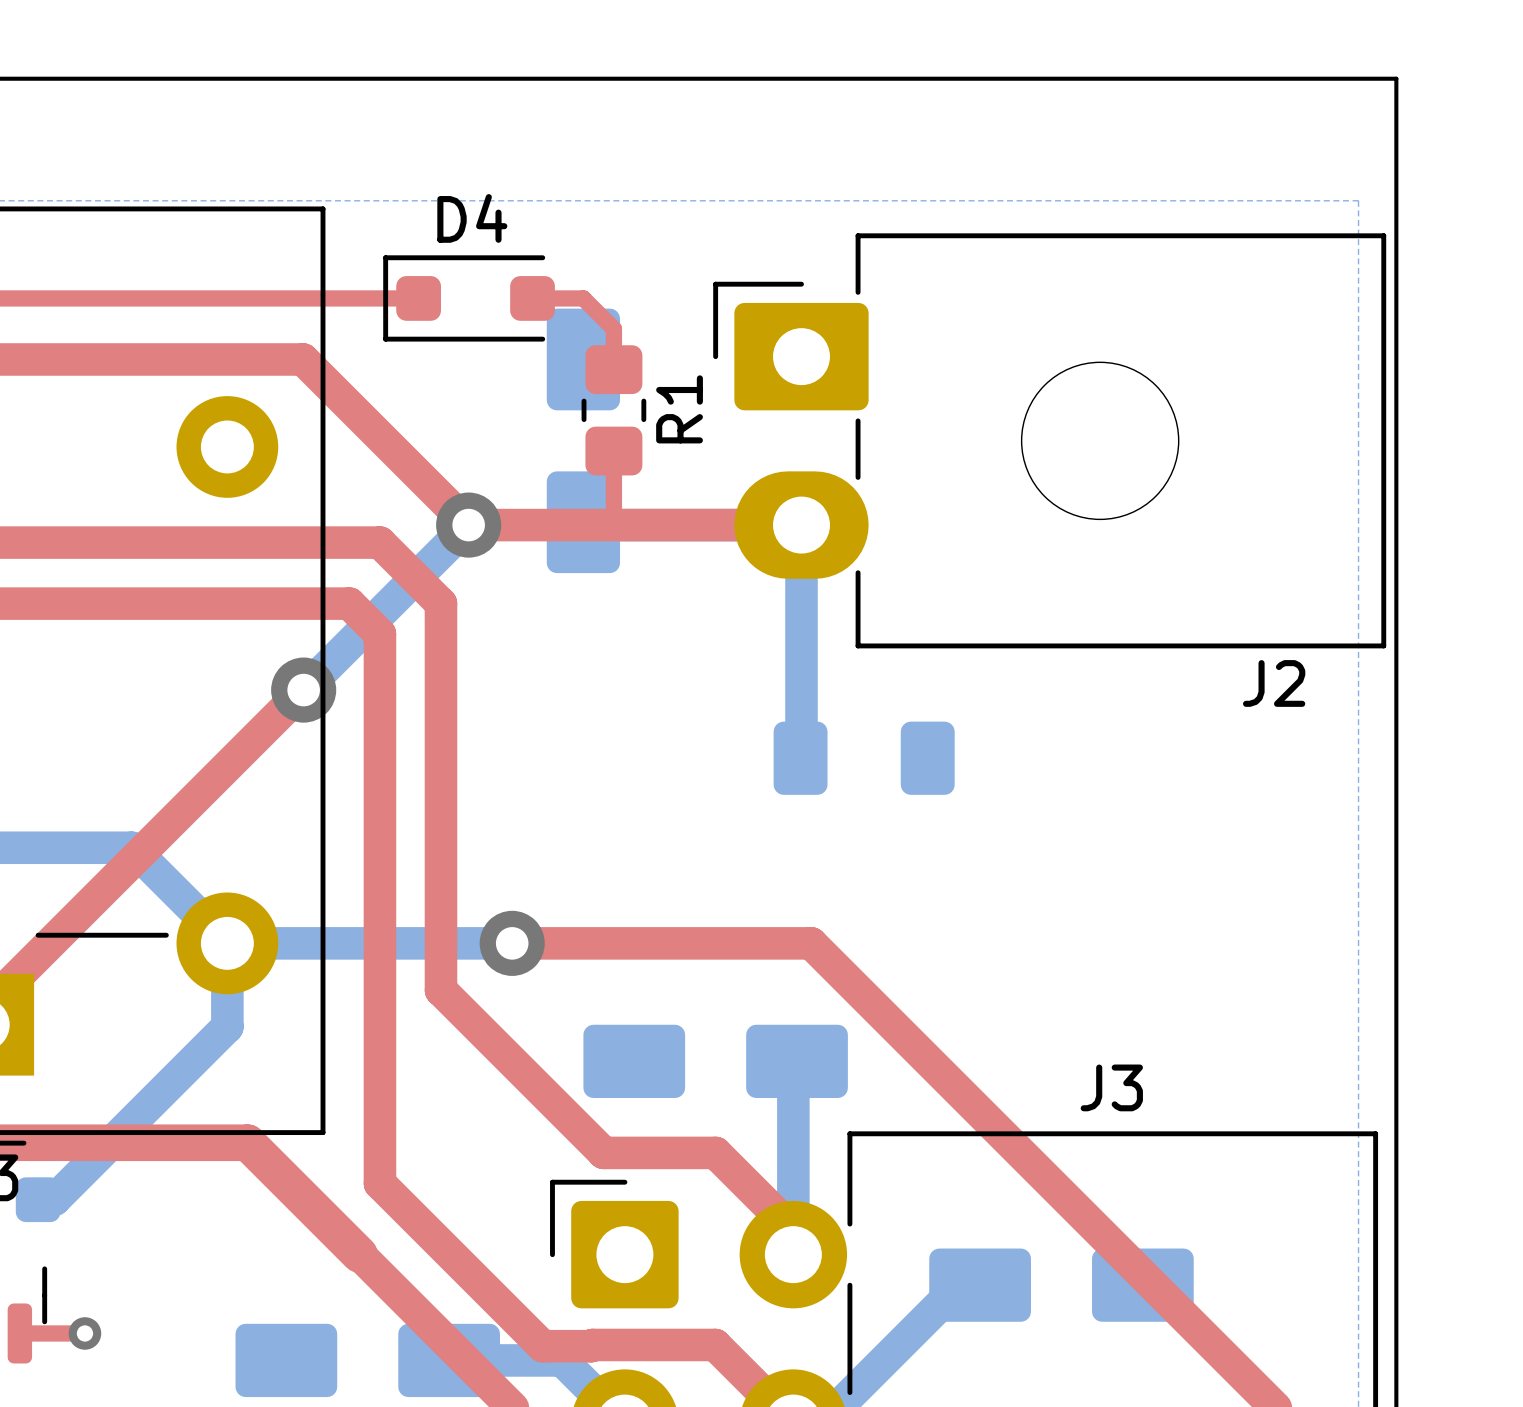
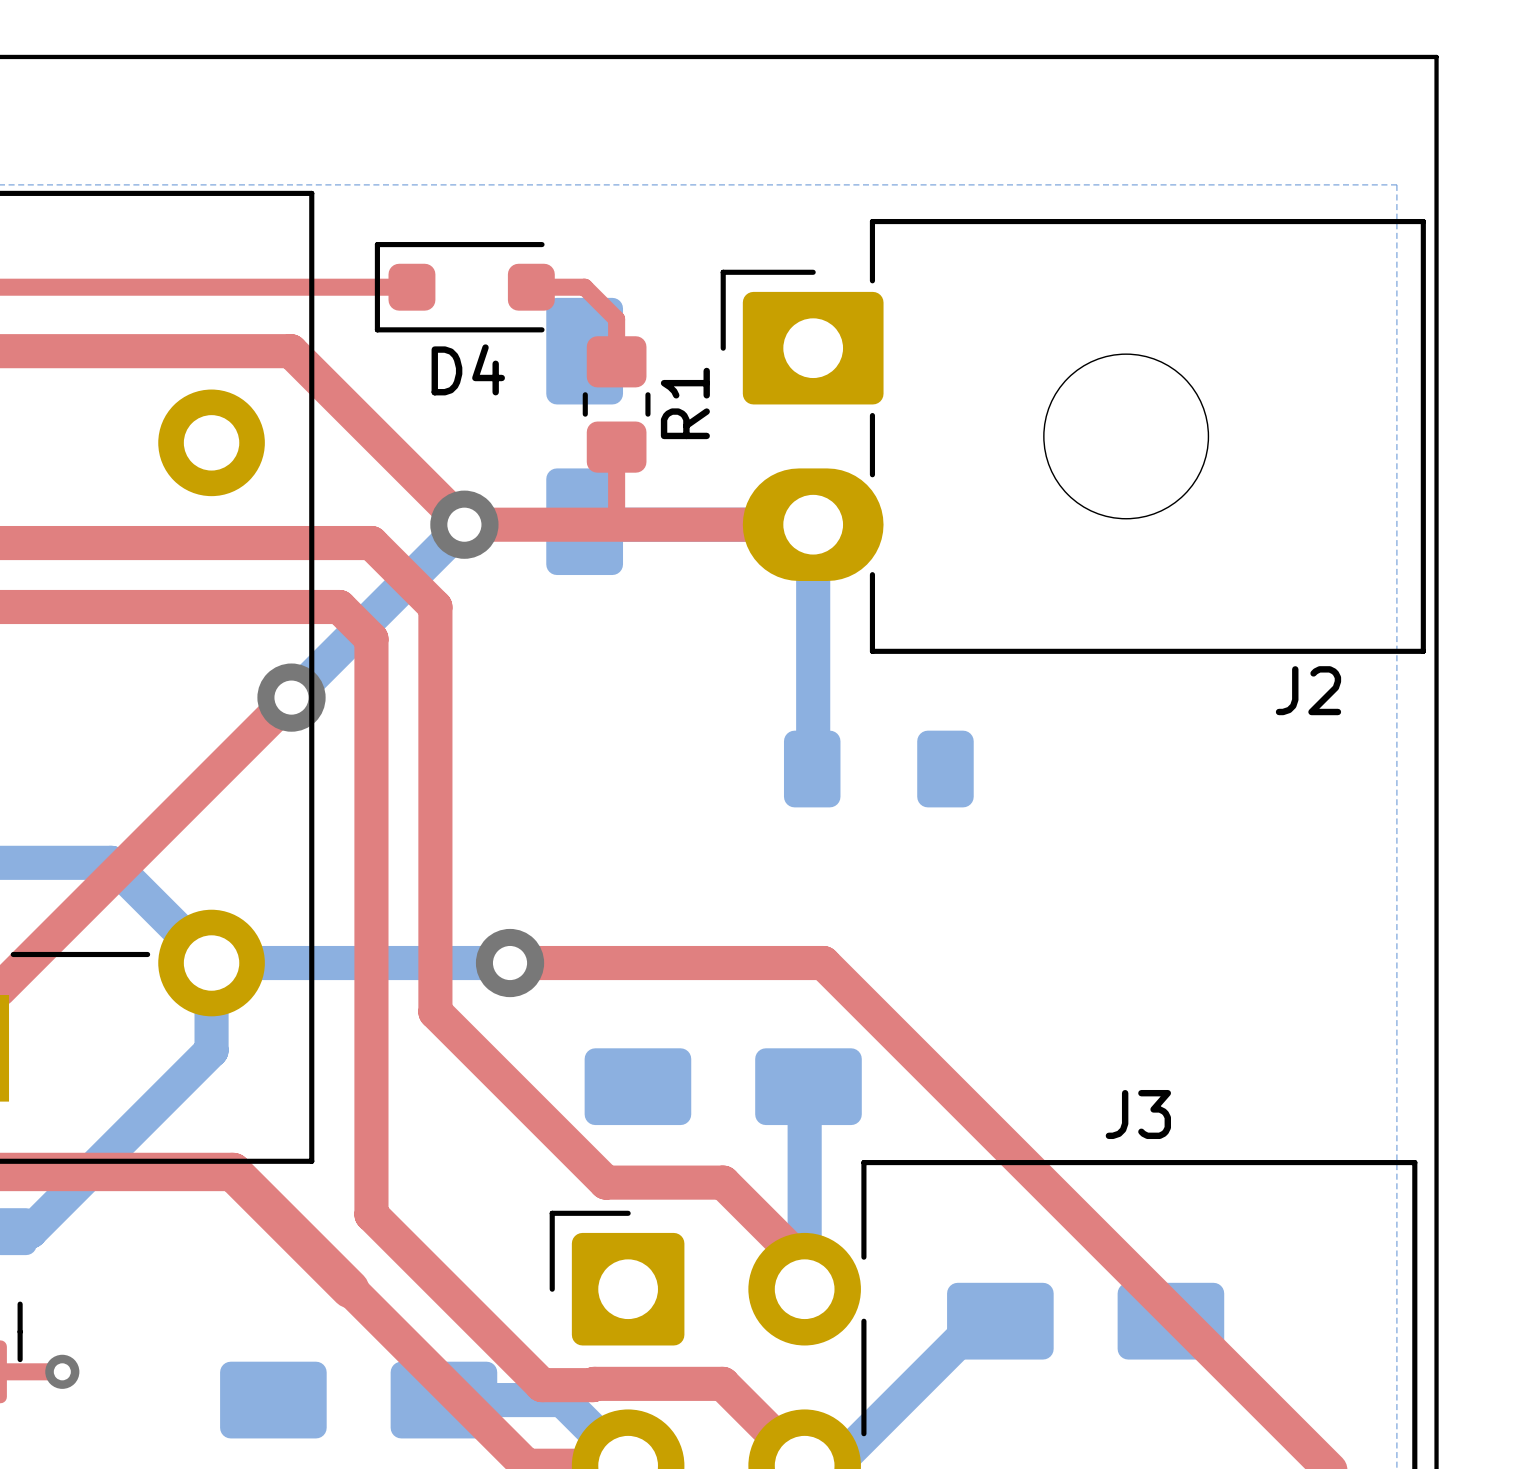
D4 name position: D4 (472, 218) -> D4 (468, 369)

